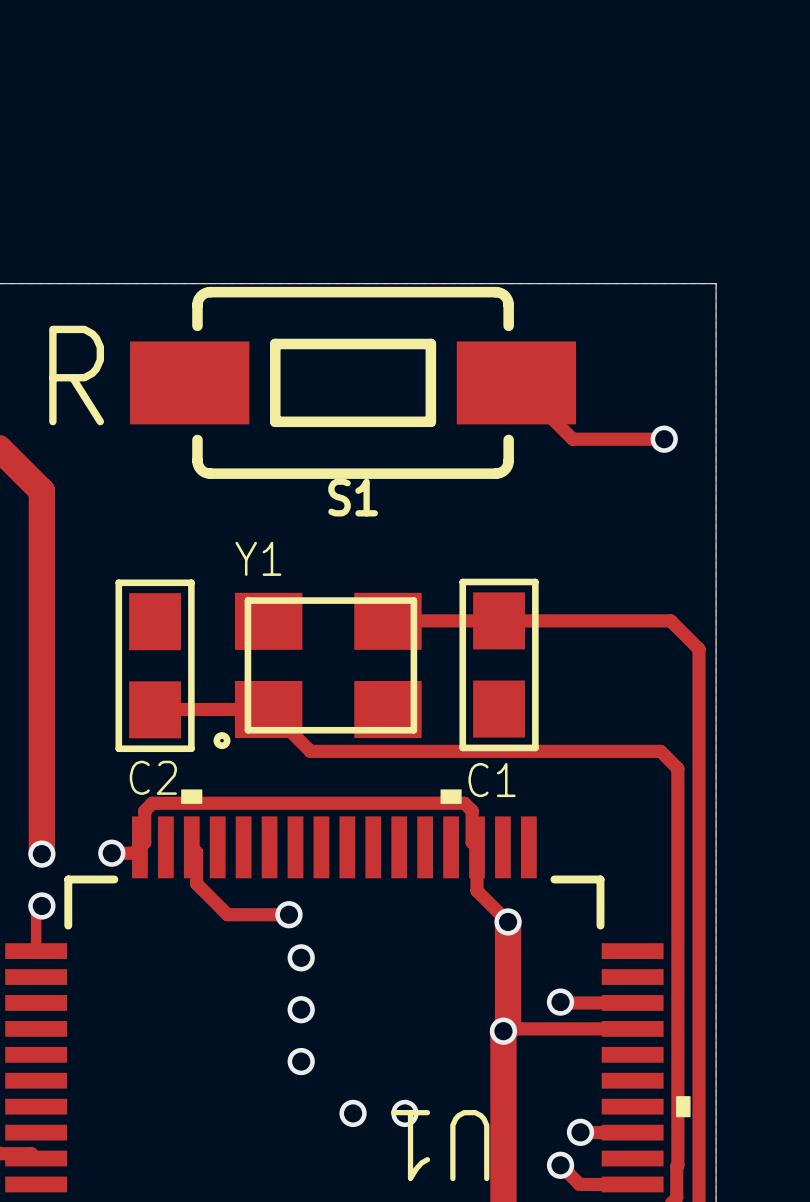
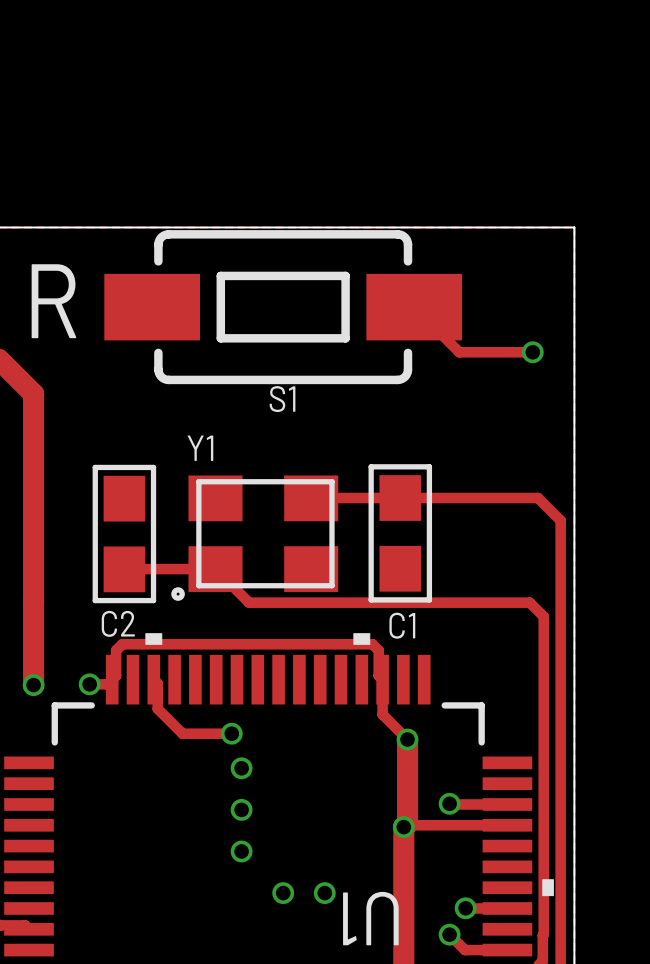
track: (41, 905) (36, 911) (36, 951) -> none
via: (41, 905) -> none

